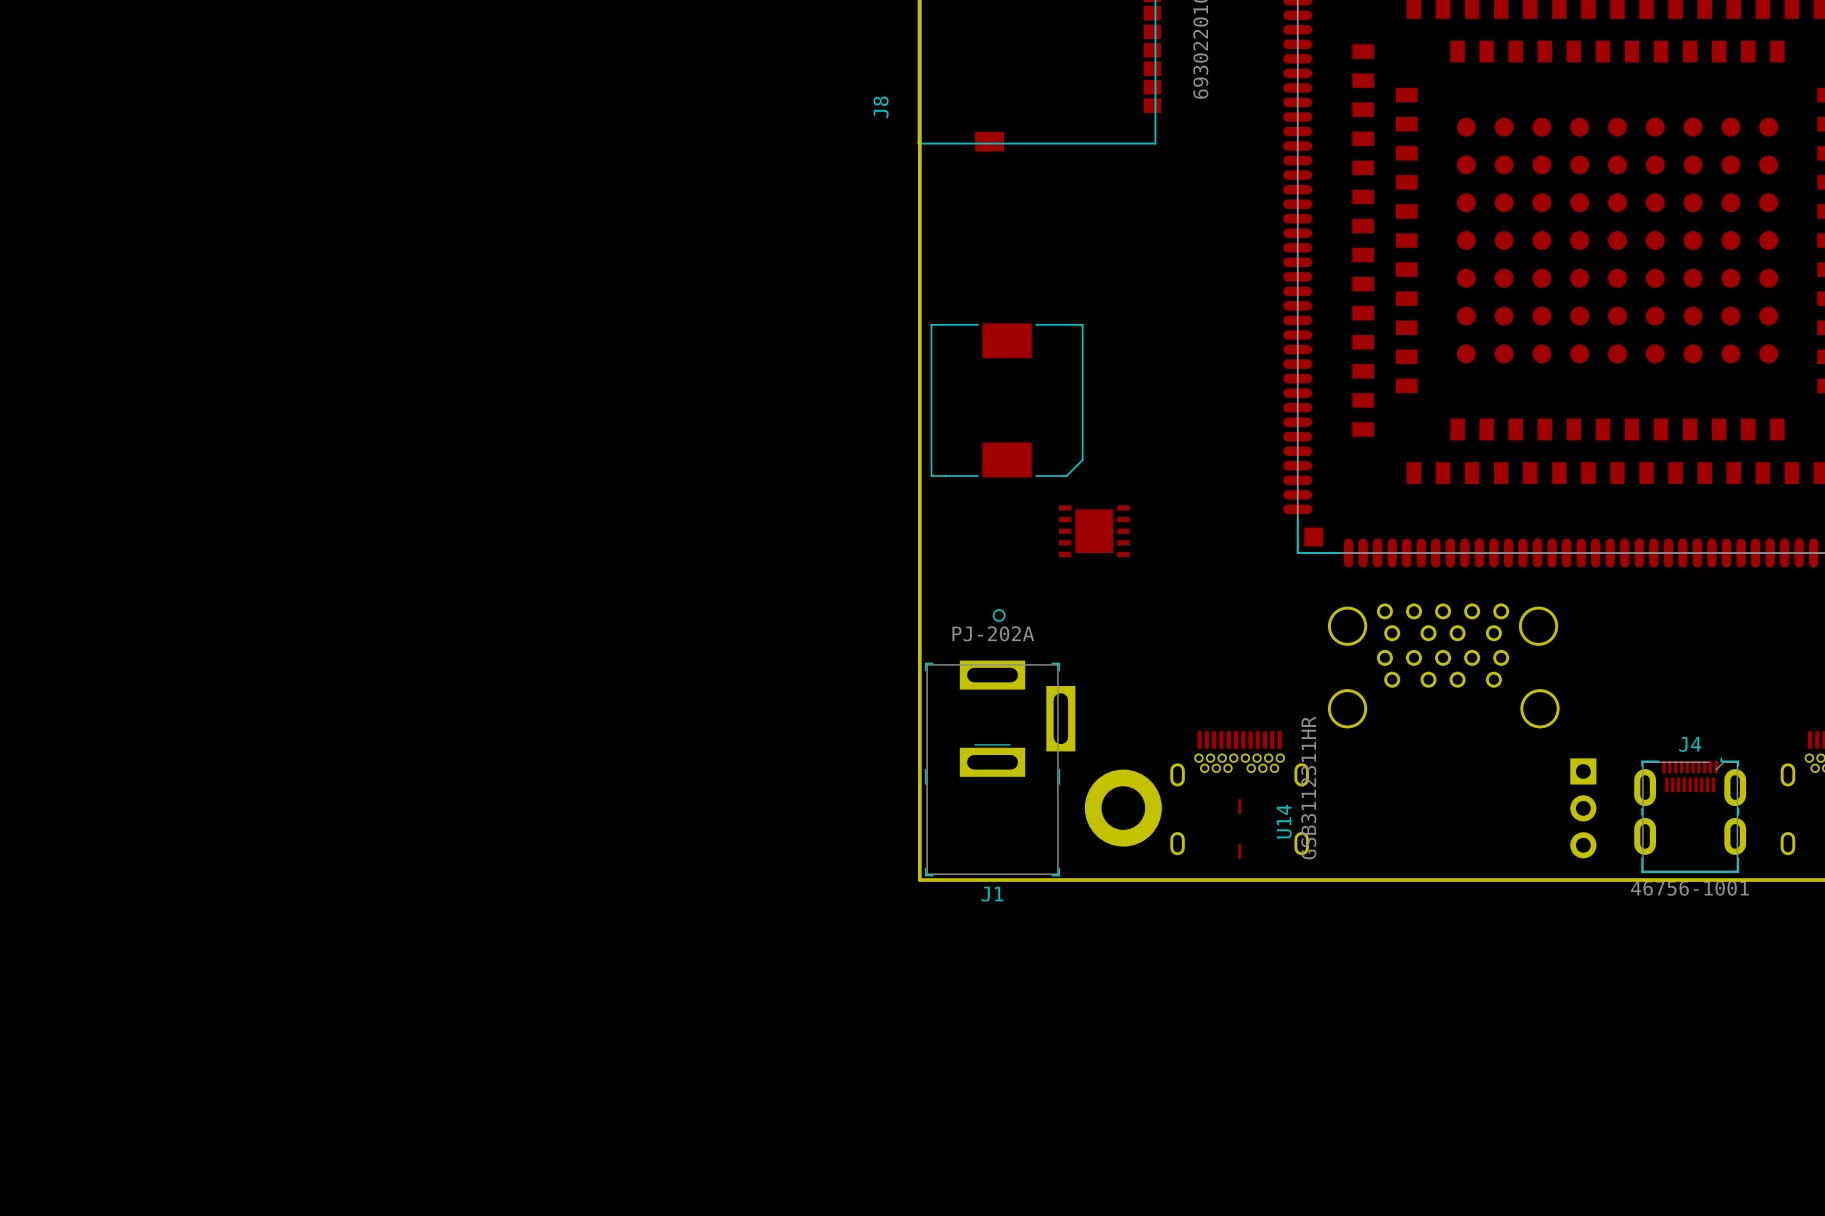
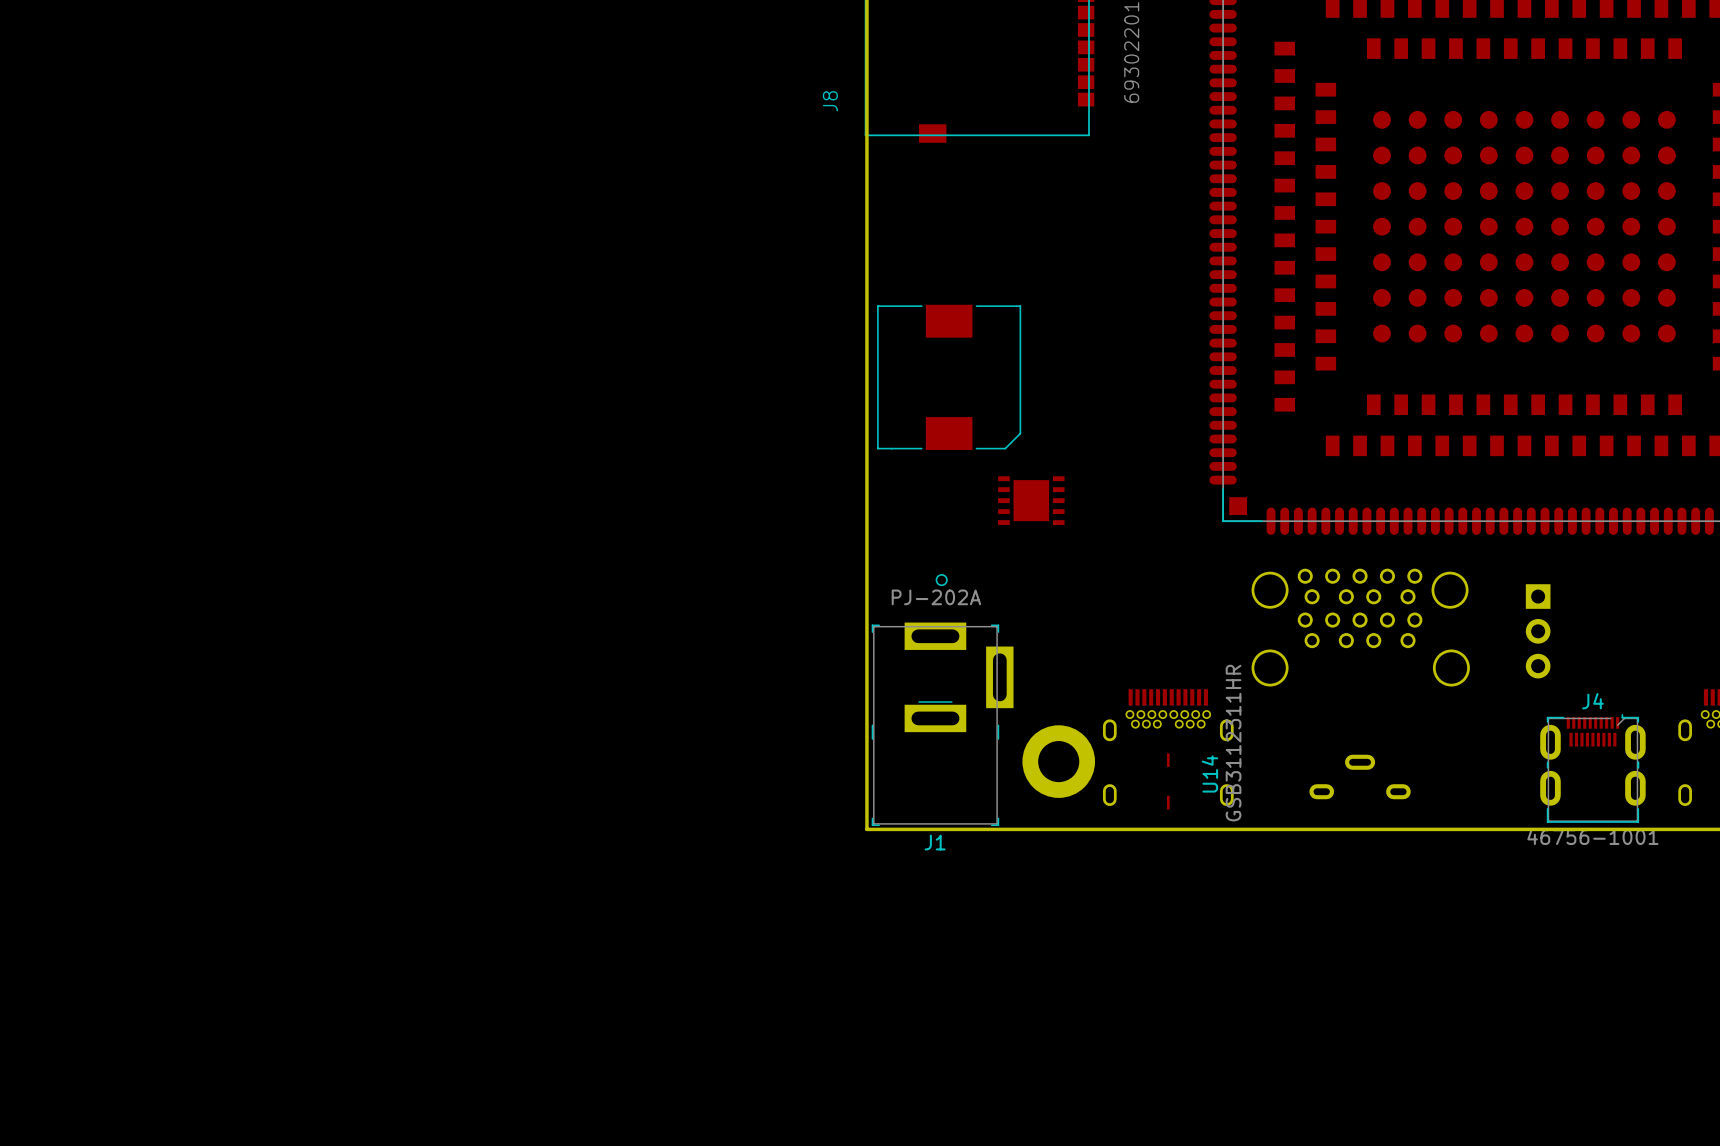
part position: (1583, 808) -> (1538, 631)
part: none -> (1360, 777)

